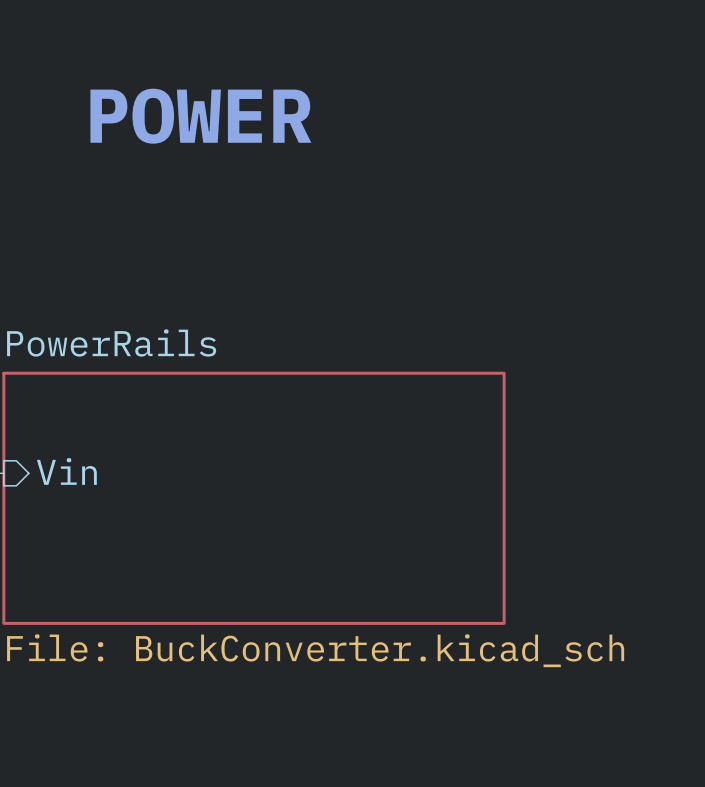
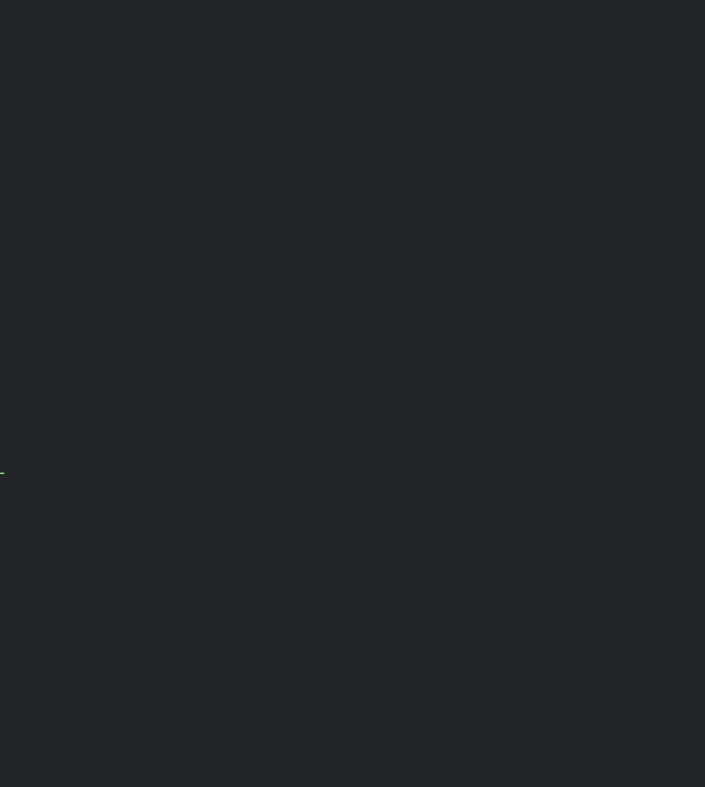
text: POWER (200, 116) -> none
sheet pin: Vin (66, 471) -> none
sheet PowerRails: File: BuckConverter.kicad_sch (253, 498) -> none

